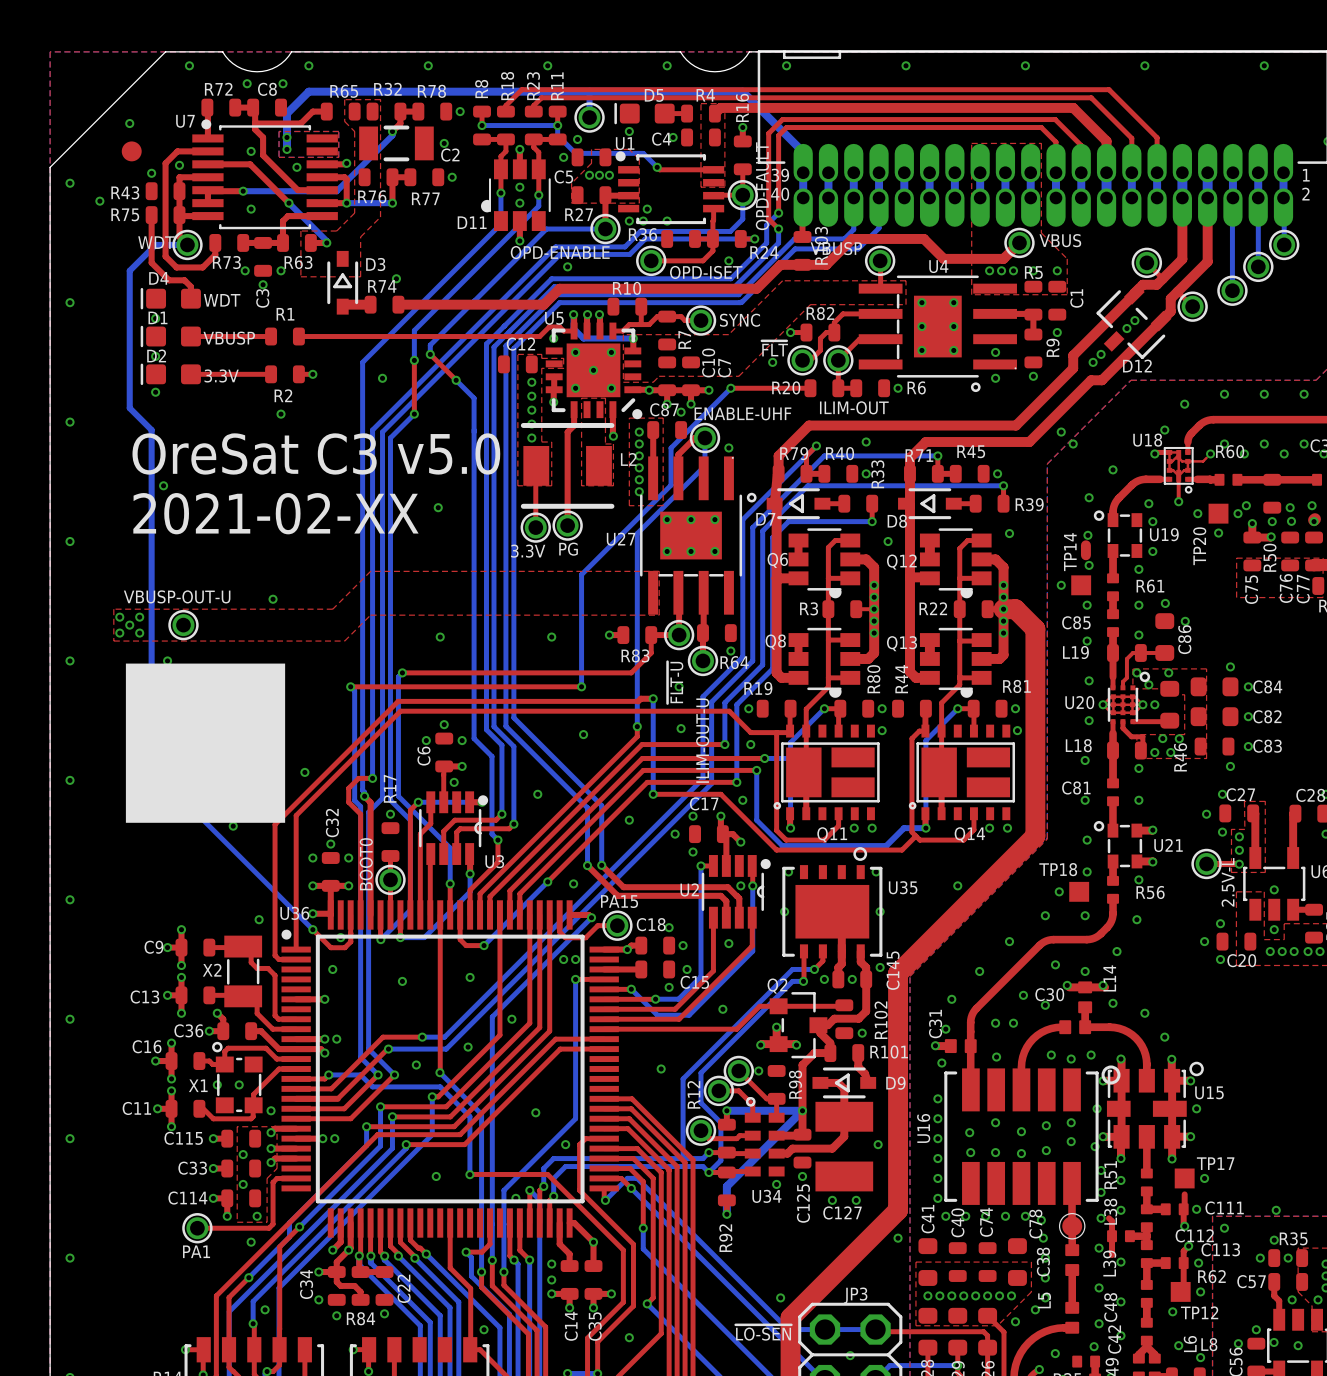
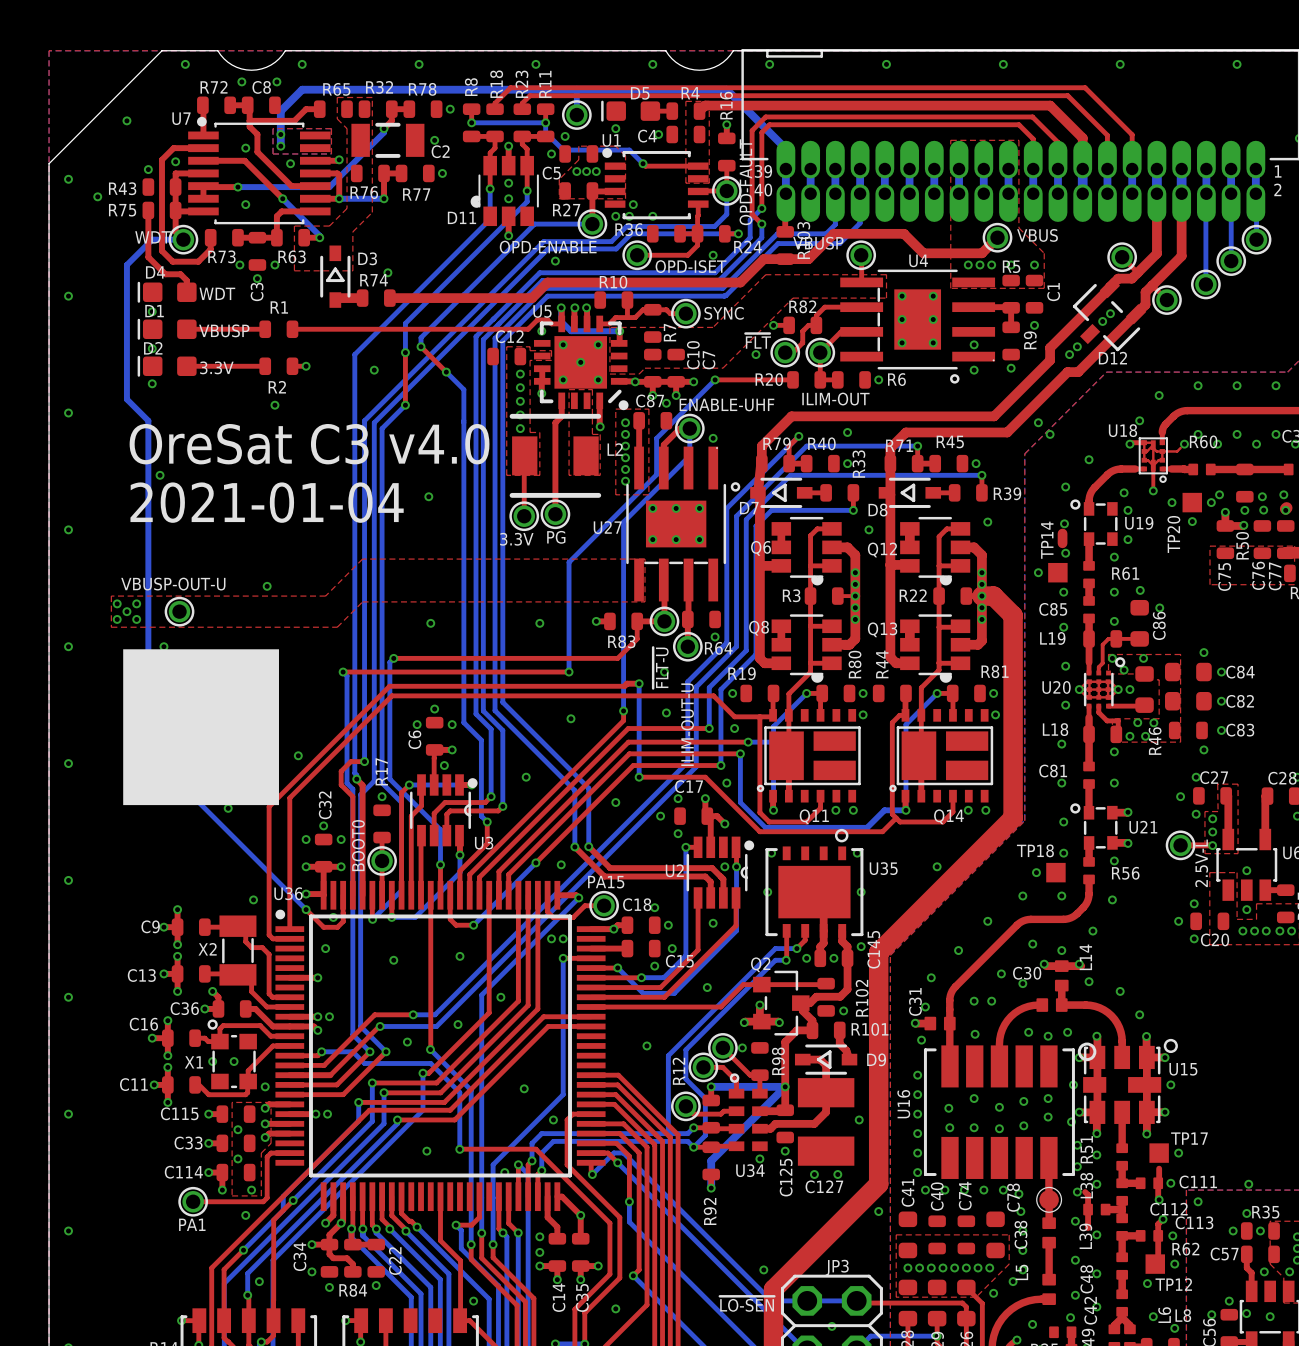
part: (131, 151) -> none
text: OreSat C3 v5.0 (316, 453) -> OreSat C3 v4.0 (309, 444)
text: 2021-02-XX (275, 513) -> 2021-01-04 (267, 502)

